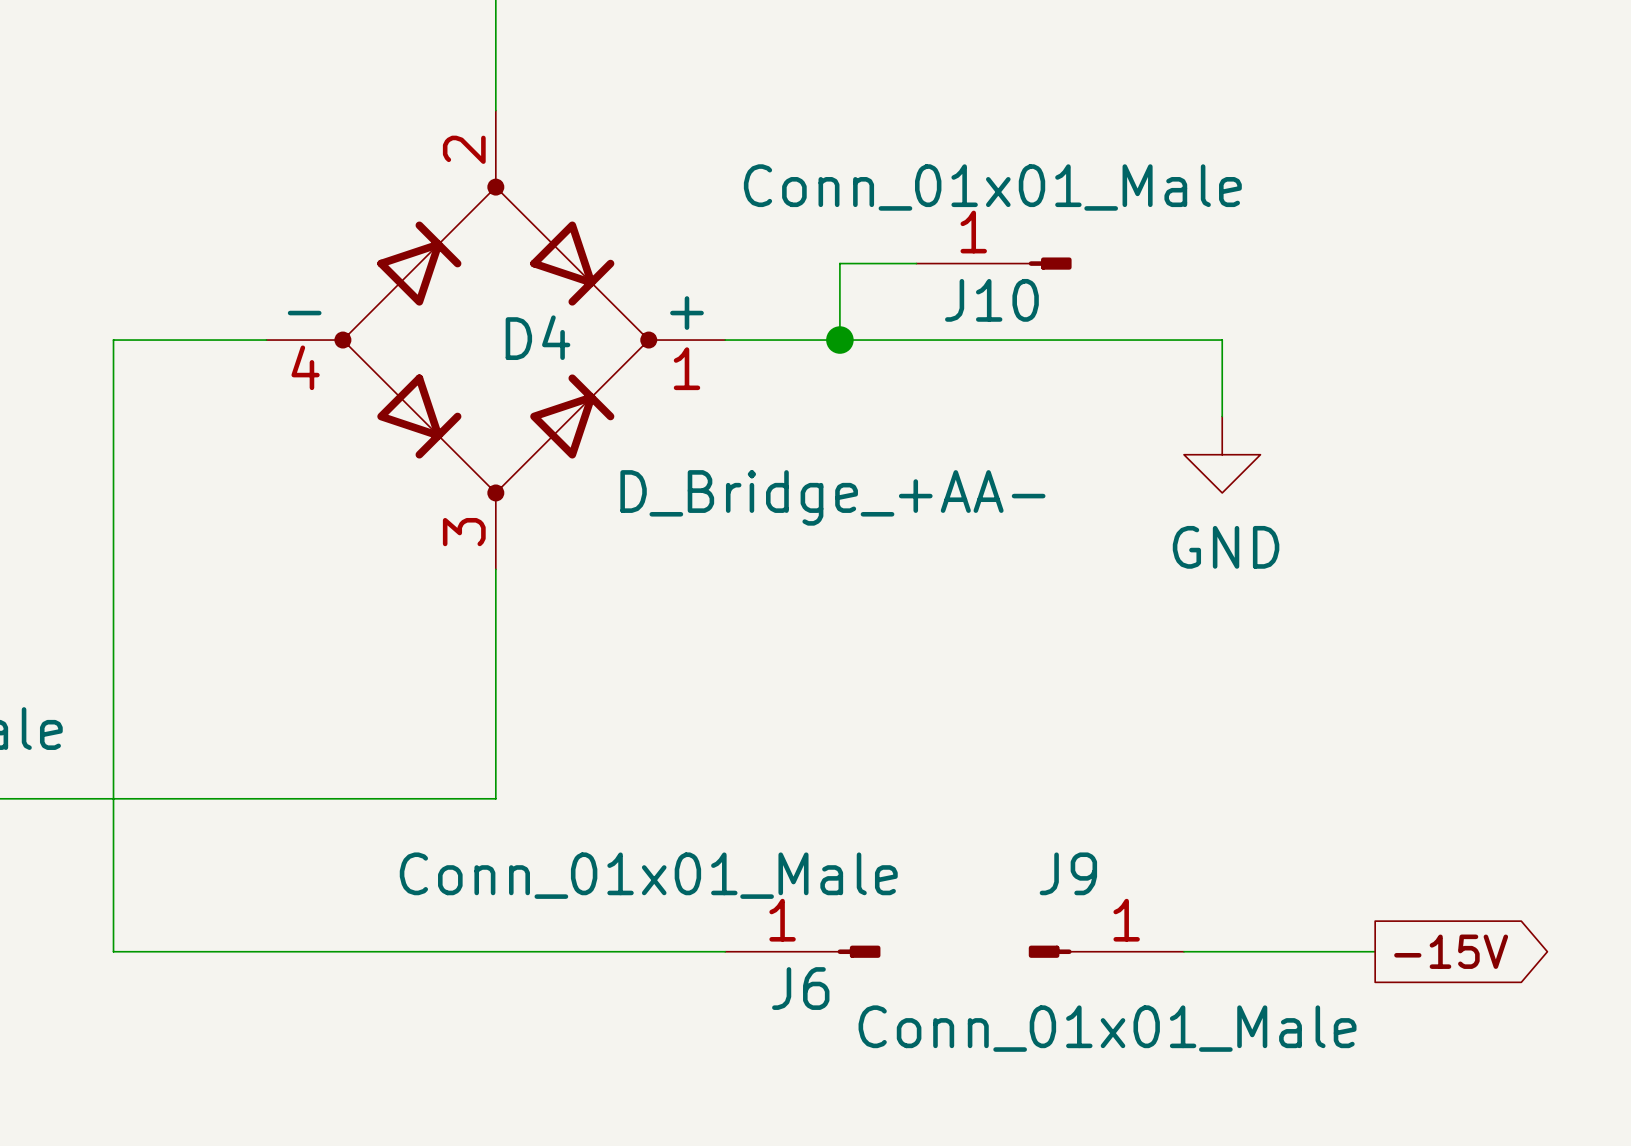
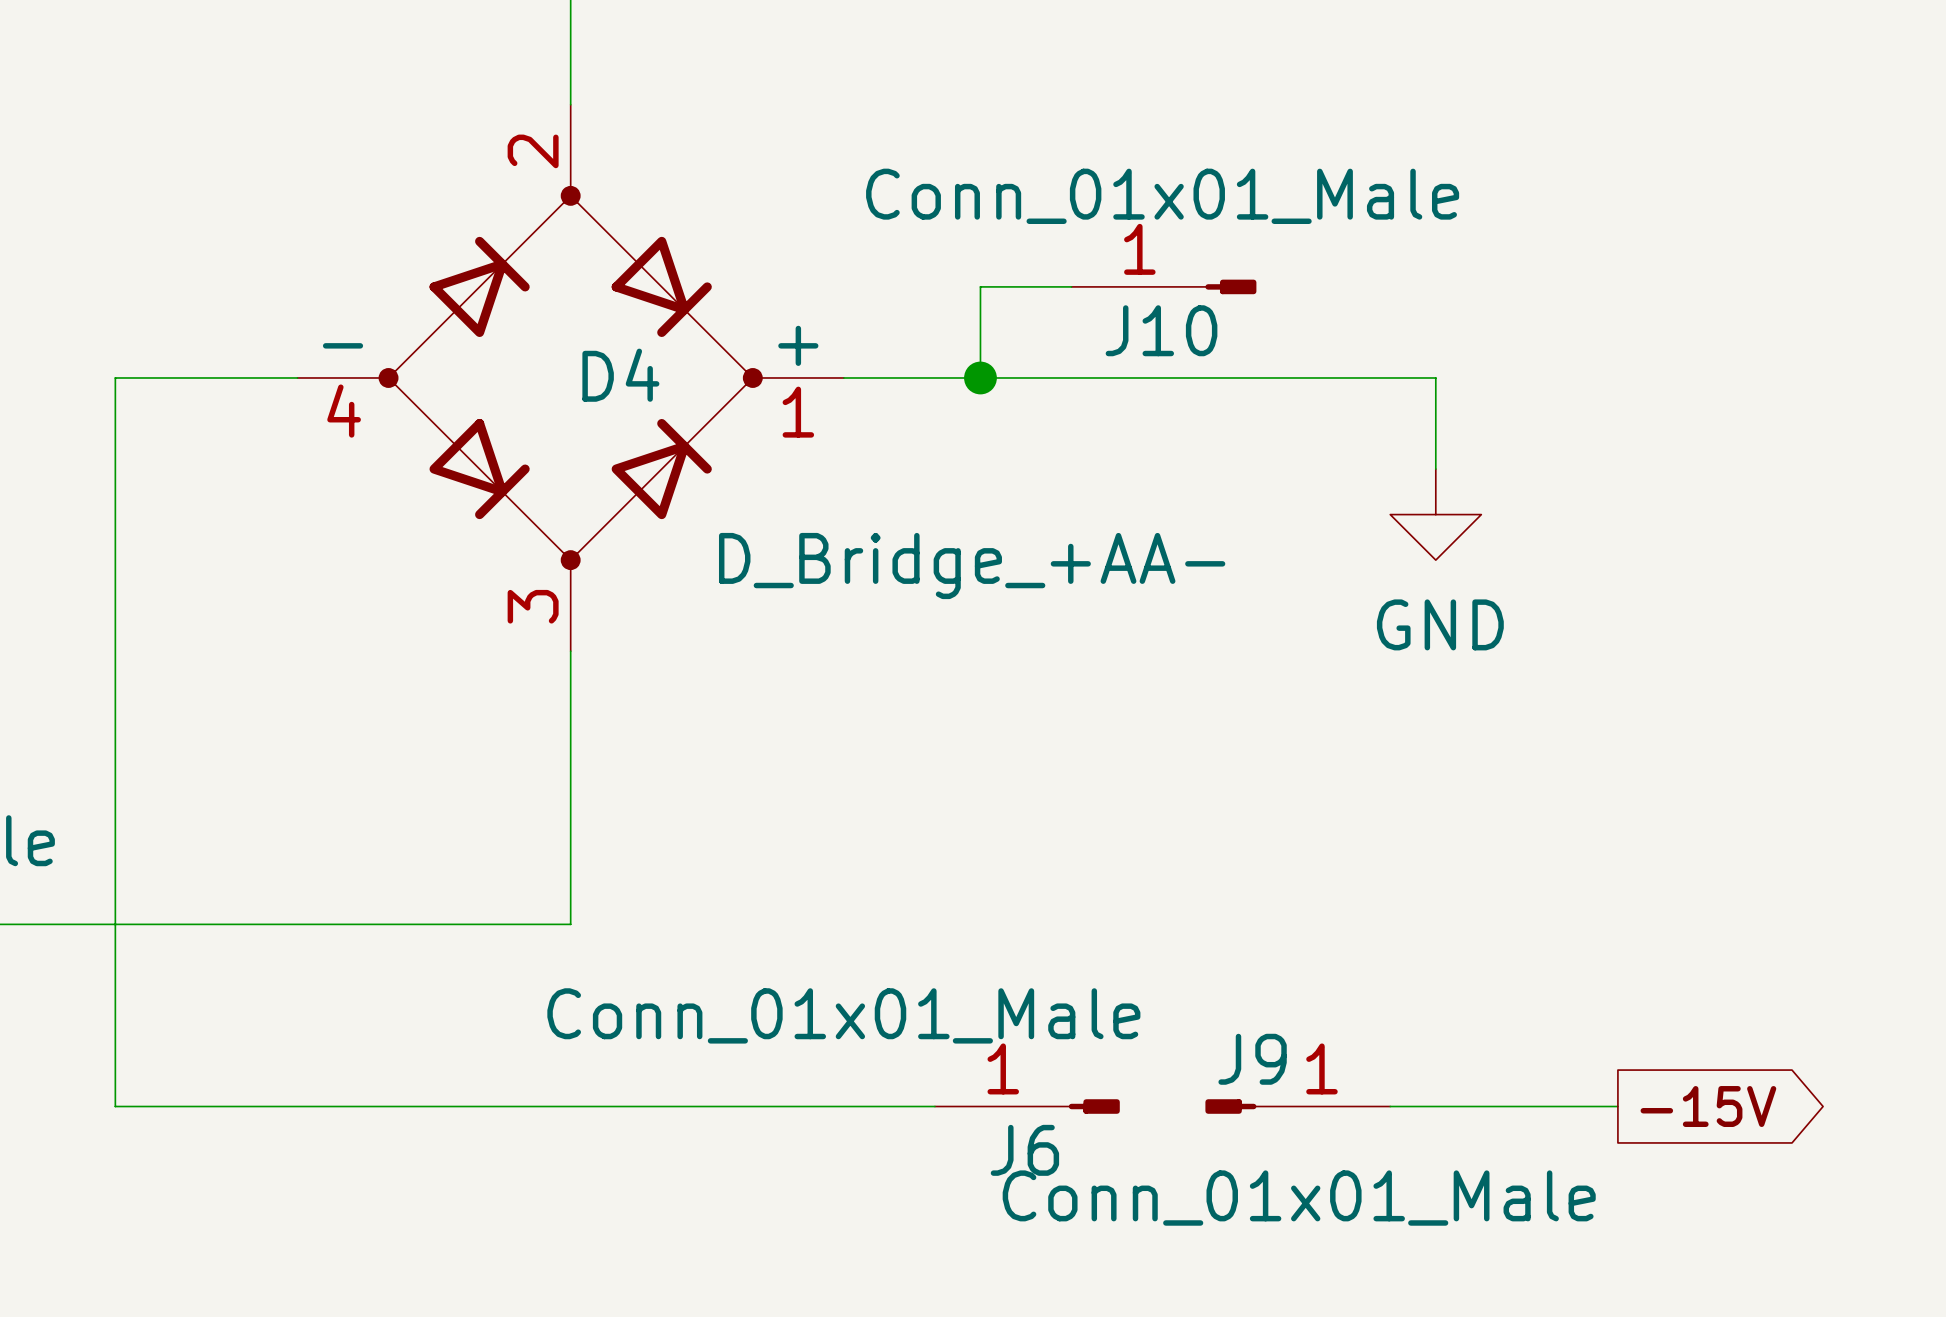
J9 name position: J9 (1068, 873) -> J9 (1252, 1059)
J6 position: (802, 951) -> (1027, 1106)

